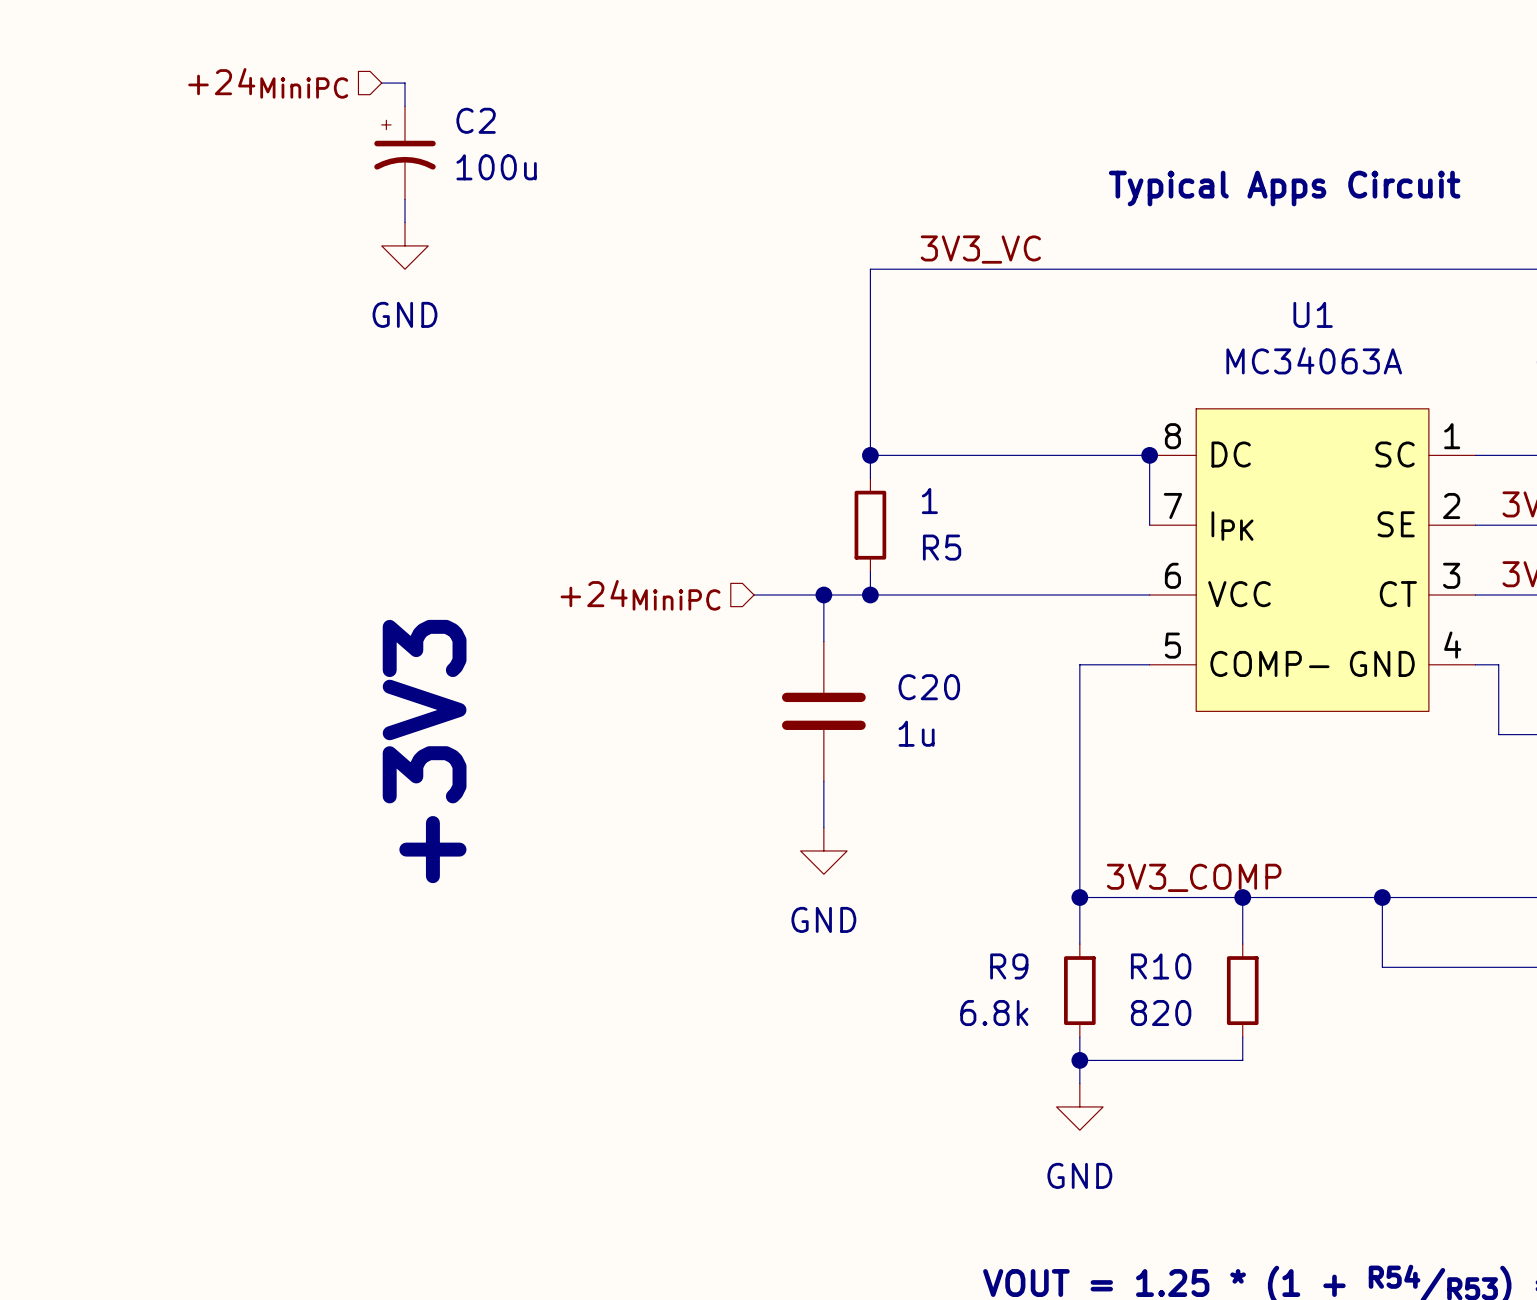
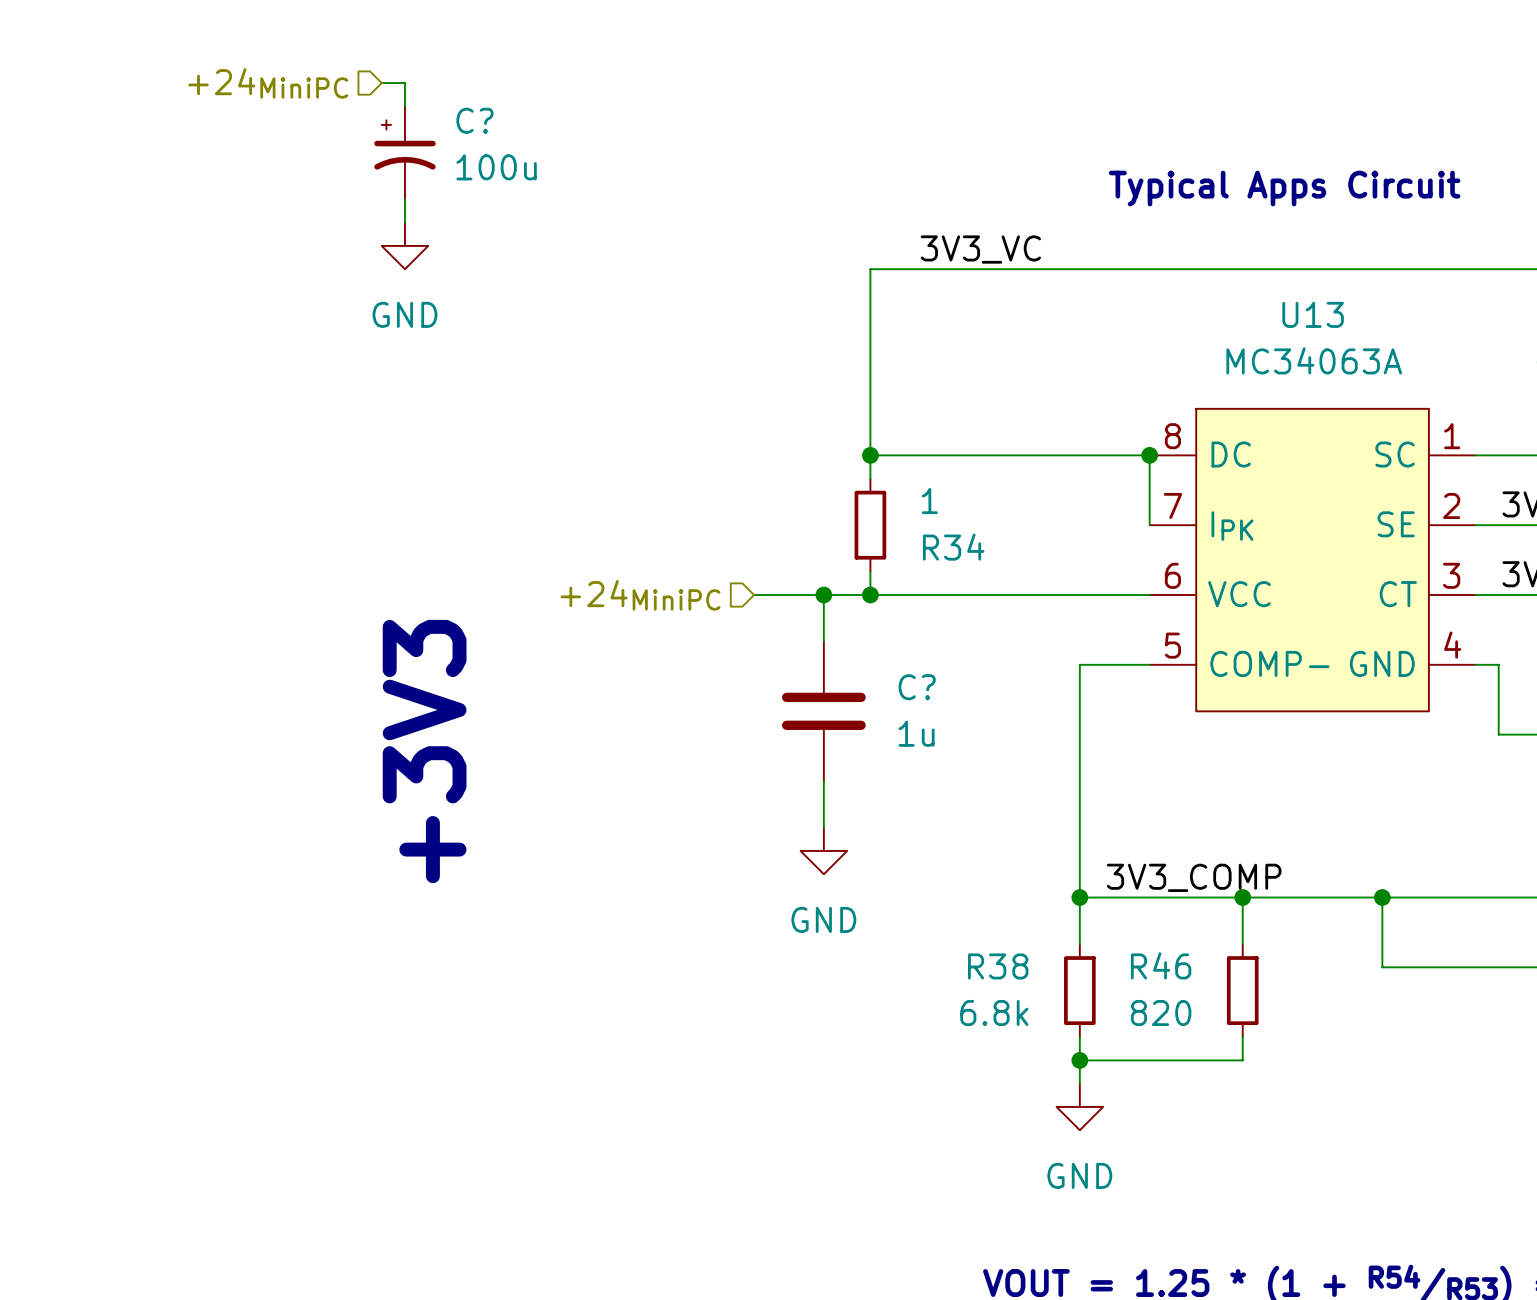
C2 name: C2 (476, 120) -> C? (474, 120)
U1 name: U1 (1313, 314) -> U13 (1313, 314)
R5 name: R5 (942, 547) -> R34 (953, 547)
C20 name: C20 (929, 687) -> C? (917, 687)
R9 name: R9 (1009, 966) -> R38 (998, 966)
R10 name: R10 (1161, 966) -> R46 (1161, 965)

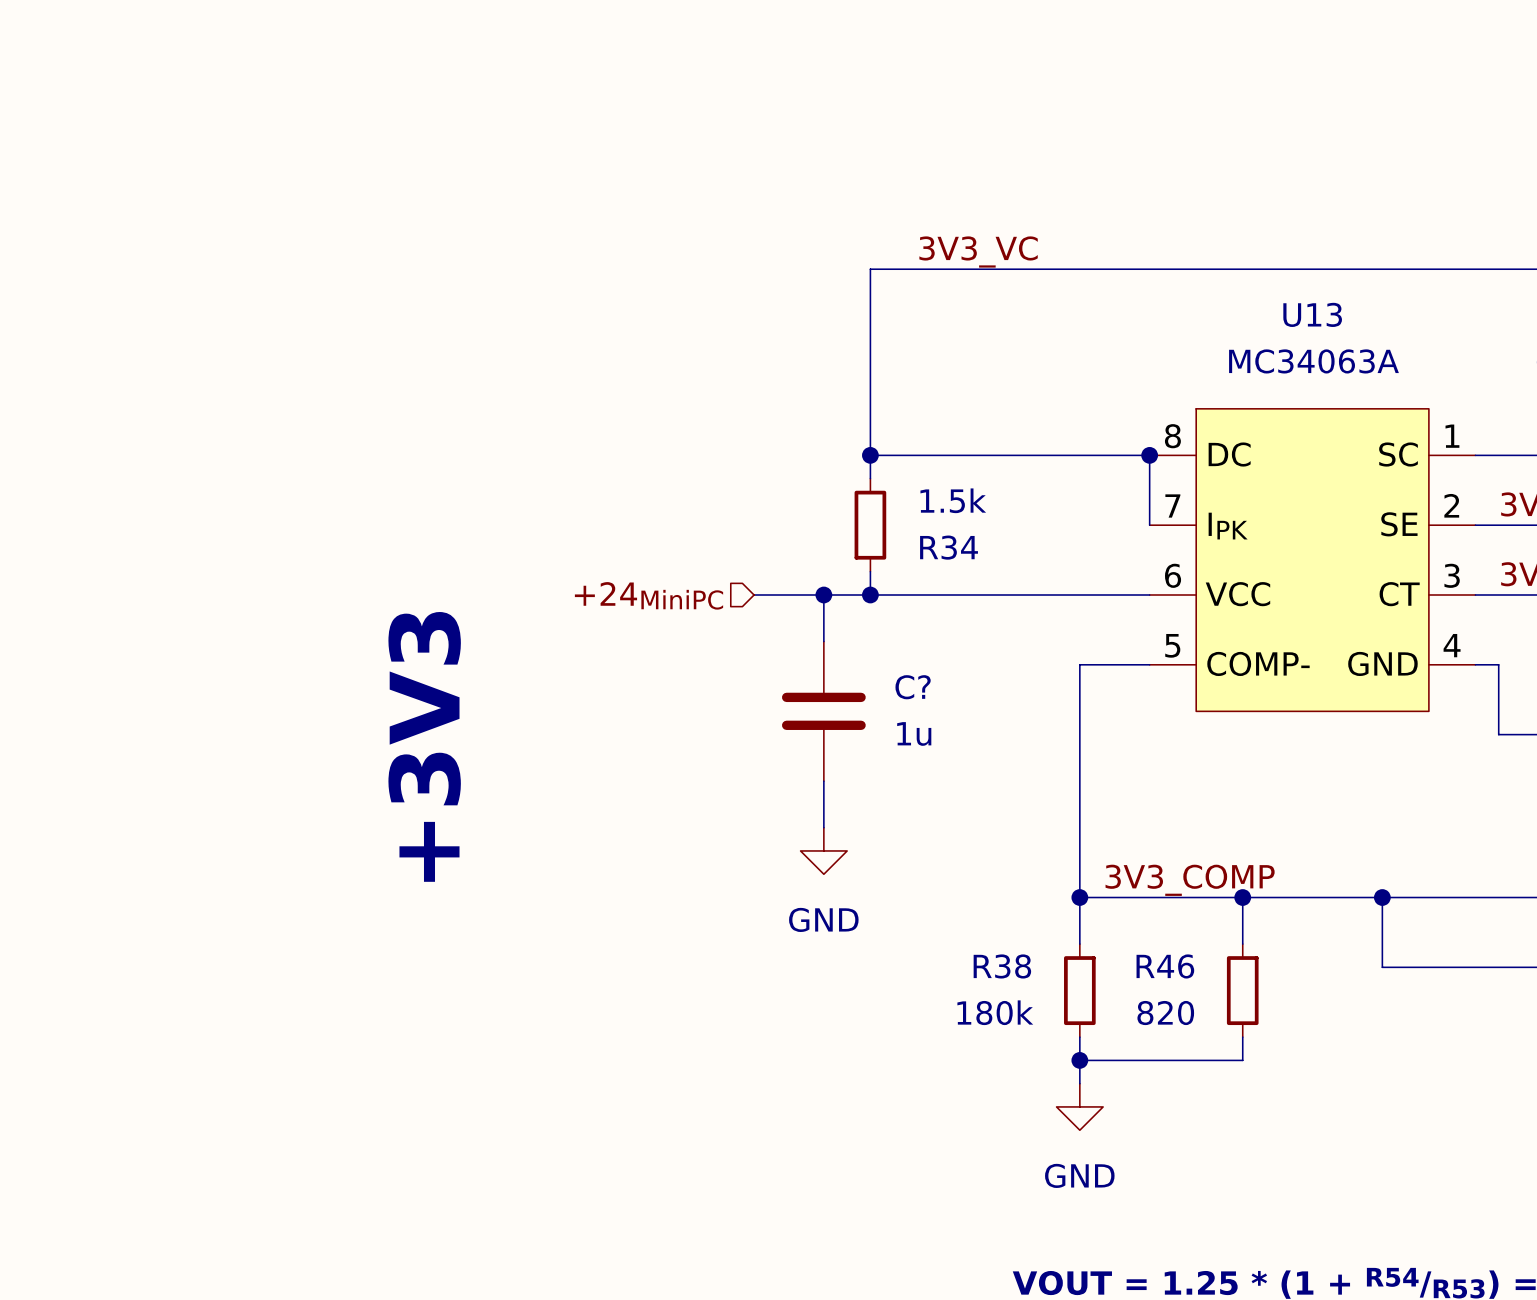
hierarchical label: +24MiniPC (268, 83) -> none
wire: (381, 83) (404, 83) (404, 106) -> none
C?: 100u (404, 152) -> none
text: Typical Apps Circuit (1284, 188) -> none
wire: (404, 199) (404, 222) -> none
power symbol: GND (404, 245) -> none
R34 value: 1 (929, 501) -> 1.5k (953, 500)
R38 value: 6.8k (994, 1013) -> 180k (995, 1012)

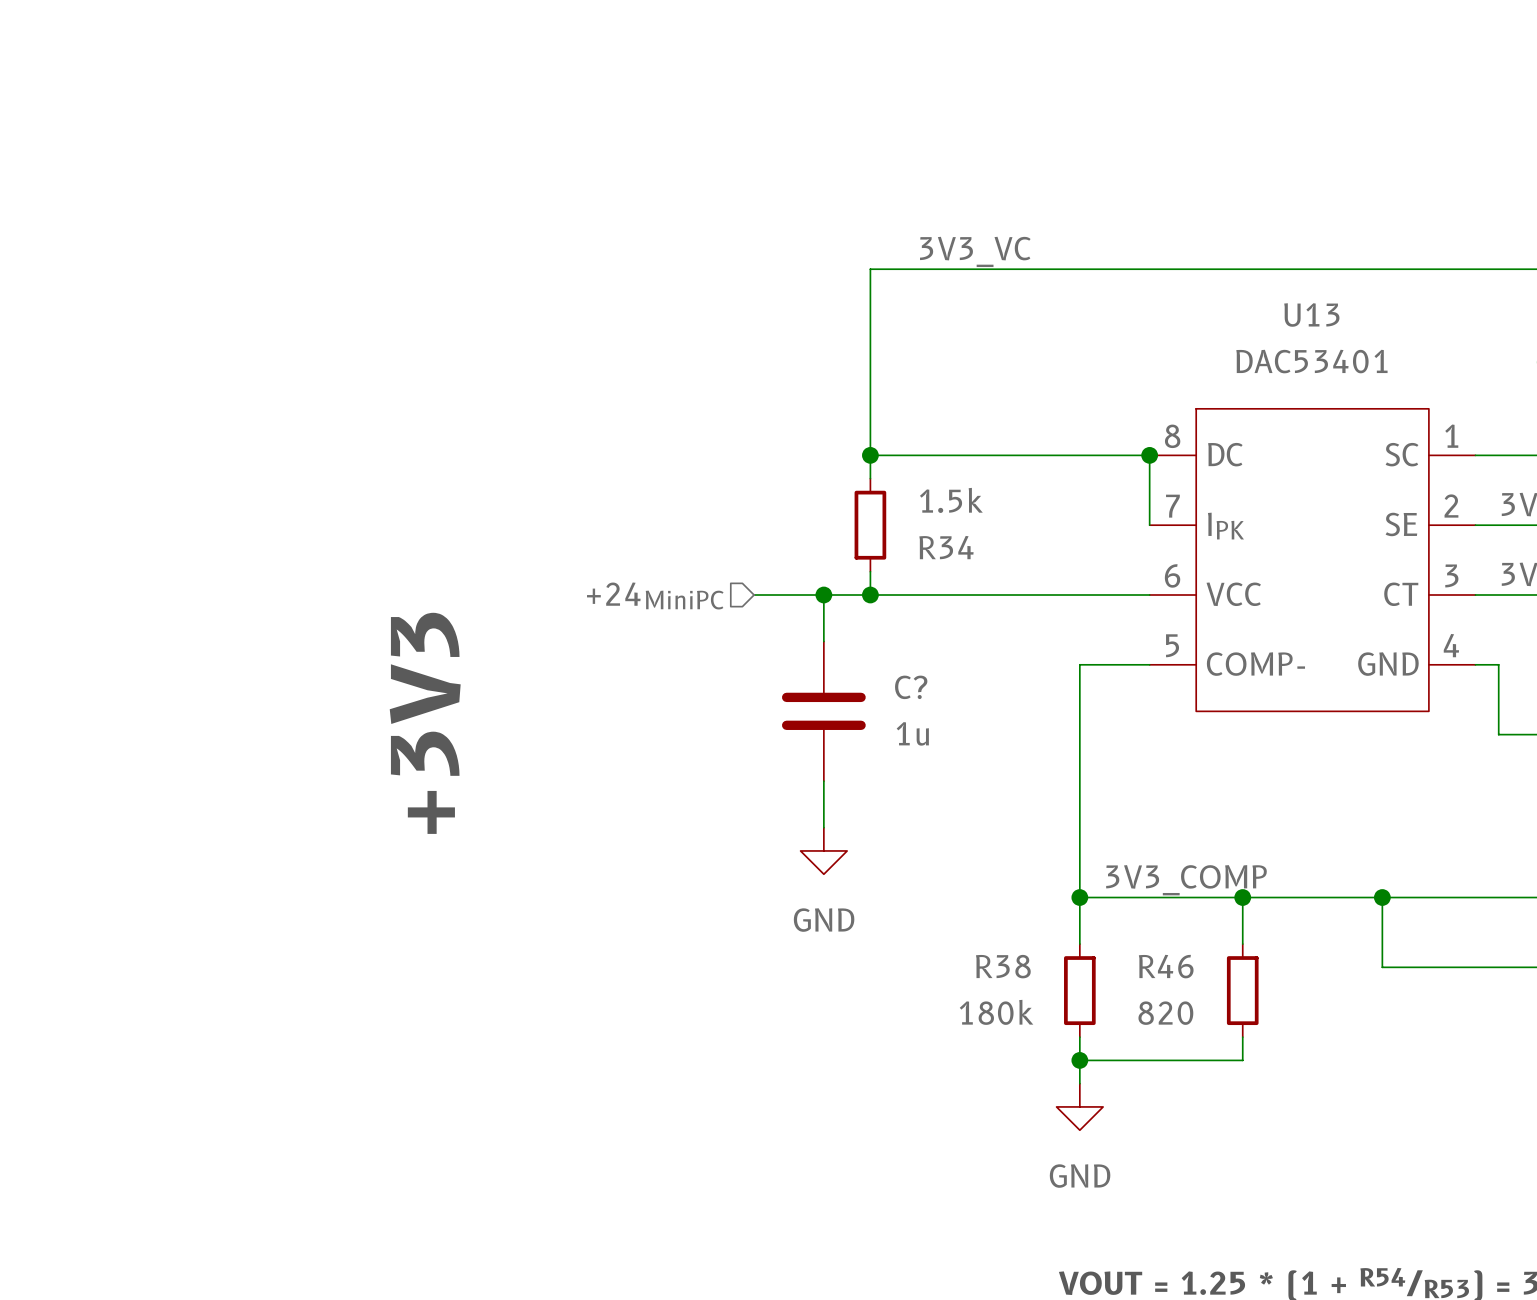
U13 value: MC34063A (1313, 361) -> DAC53401 (1311, 361)

